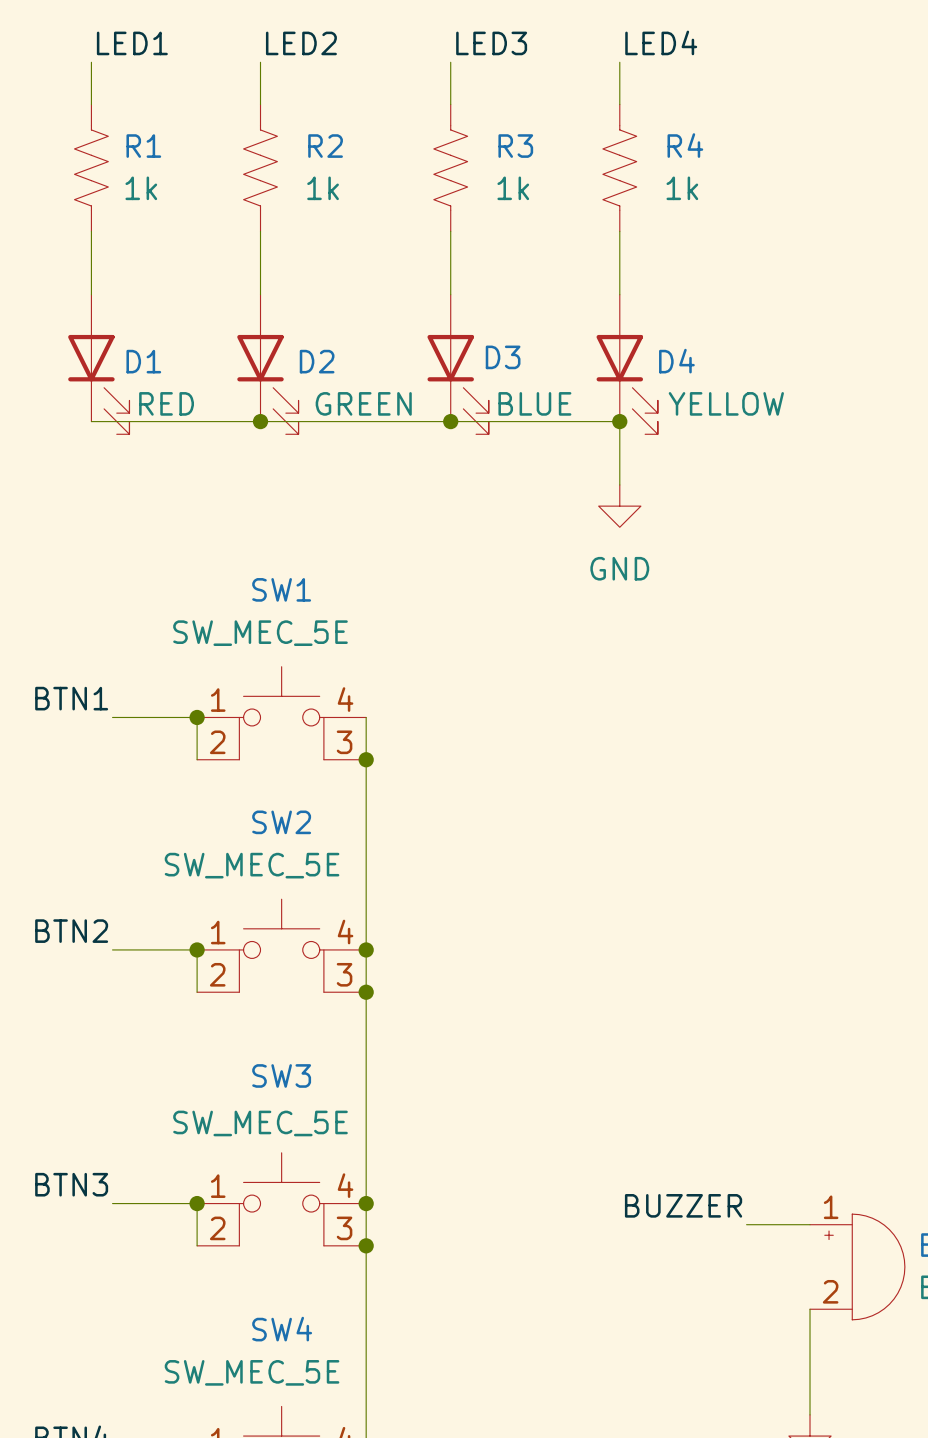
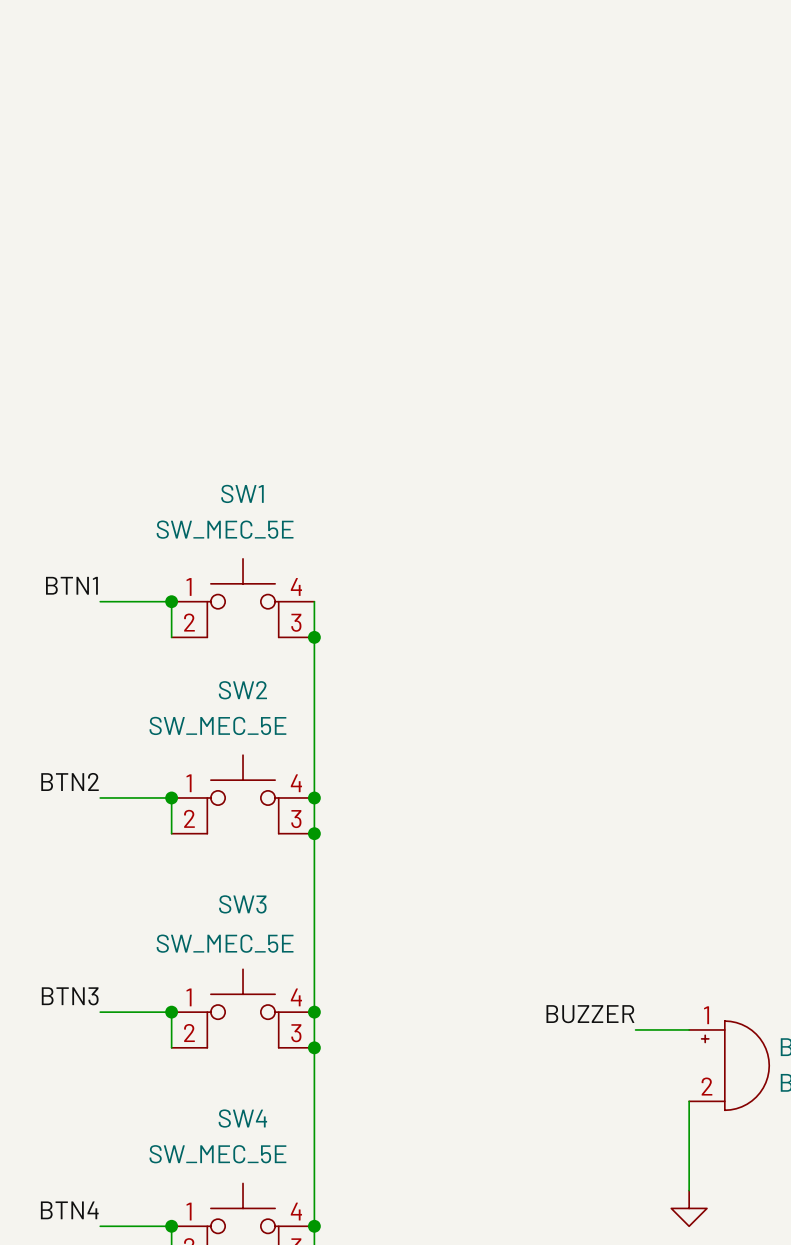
label: LED4 (661, 42) -> none
label: LED1 (132, 43) -> none
label: LED2 (301, 43) -> none
label: LED3 (491, 43) -> none
wire: (91, 62) (91, 104) -> none
wire: (260, 62) (260, 104) -> none
wire: (450, 62) (450, 104) -> none
wire: (619, 62) (619, 104) -> none
R1: 1k (91, 167) -> none
R2: 1k (260, 167) -> none
R3: 1k (450, 167) -> none
R4: 1k (619, 167) -> none
wire: (91, 231) (91, 294) -> none
wire: (260, 231) (260, 294) -> none
wire: (450, 231) (450, 294) -> none
wire: (619, 231) (619, 294) -> none
D1: RED (98, 364) -> none
D2: GREEN (267, 364) -> none
D3: BLUE (458, 364) -> none
D4: YELLOW (627, 364) -> none
wire: (91, 421) (619, 421) (619, 484) -> none
junction: (260, 421) -> none
junction: (450, 421) -> none
junction: (619, 421) -> none
power symbol: GND (619, 506) -> none

